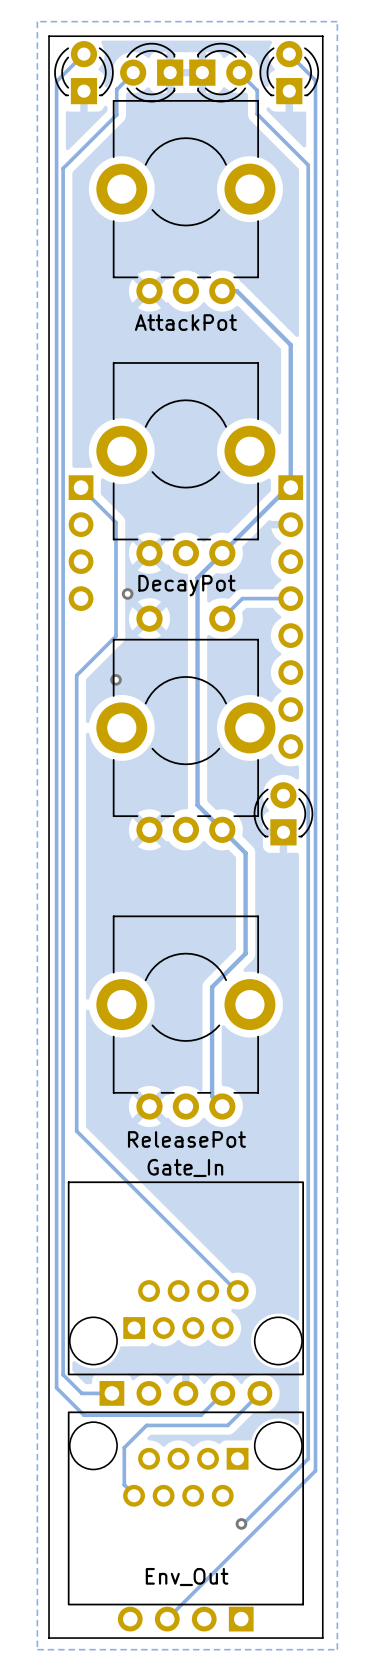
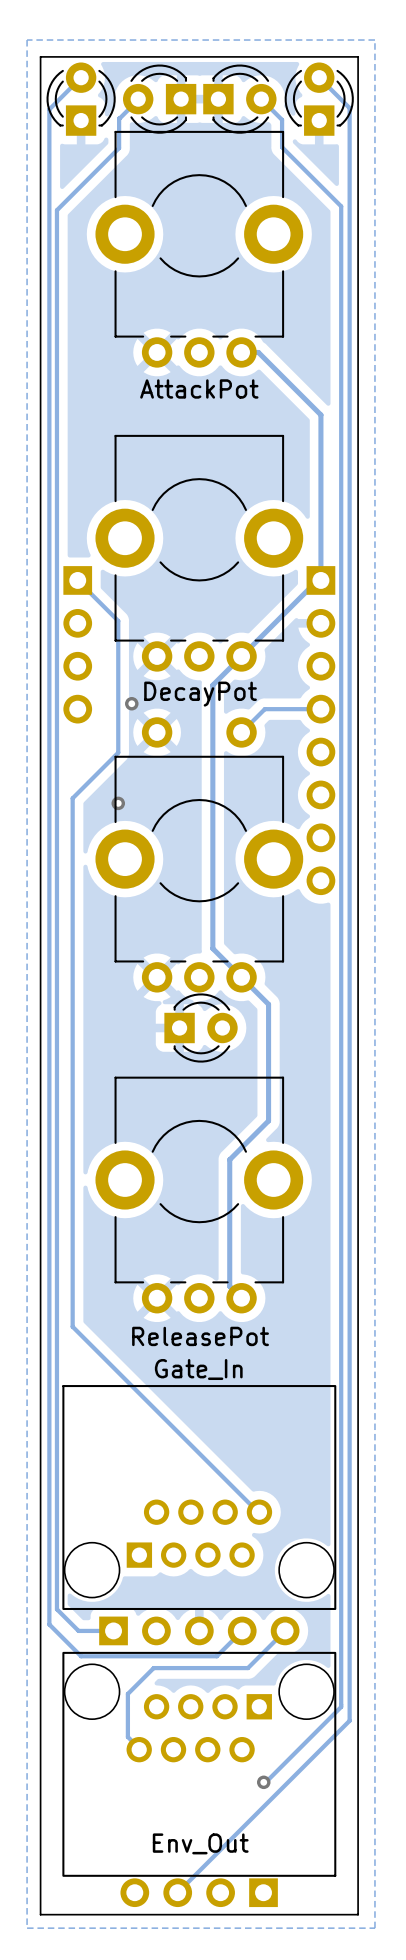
part rotation: 0° (283, 813) -> 90° clockwise (201, 1028)
part position: (283, 813) -> (201, 1028)

